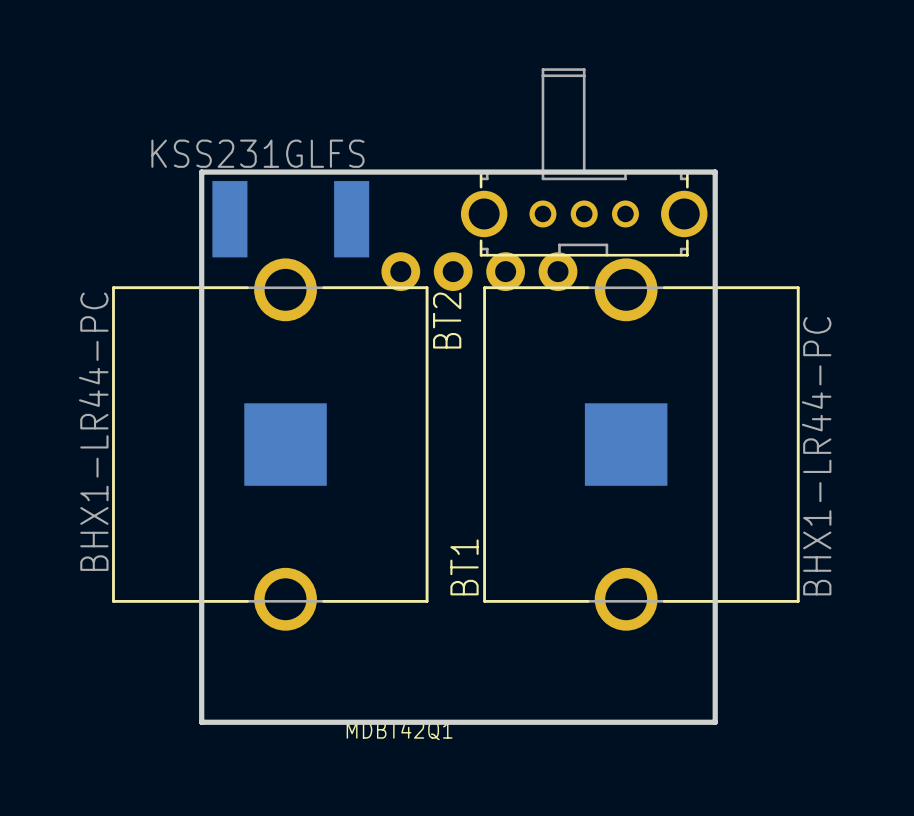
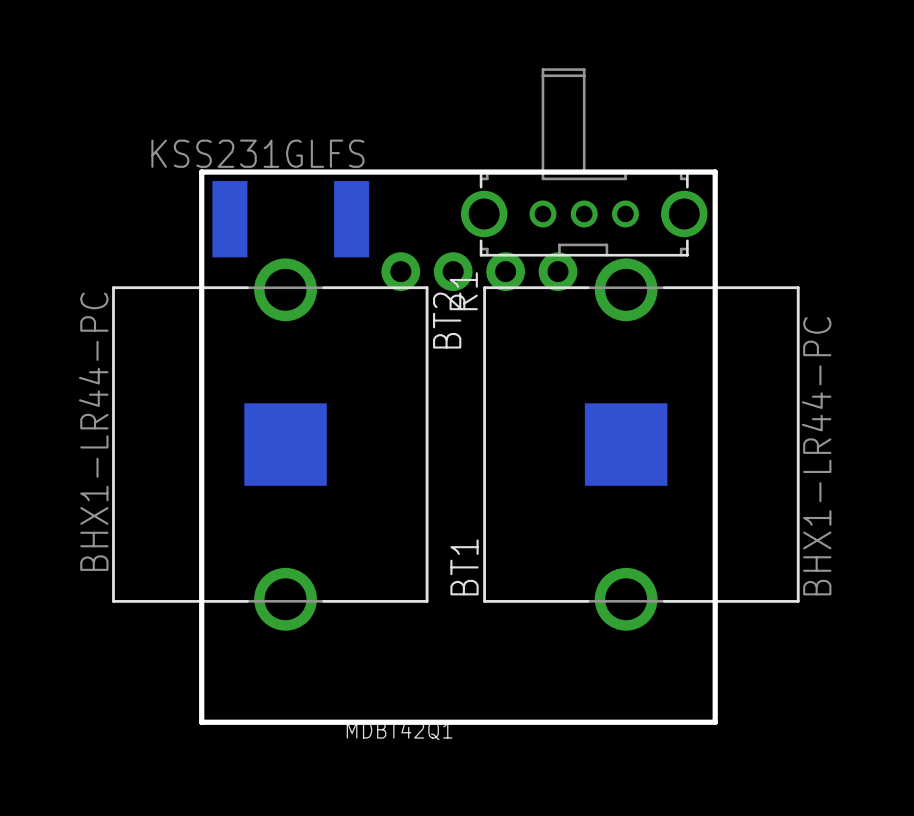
R1: none -> (463, 291)

